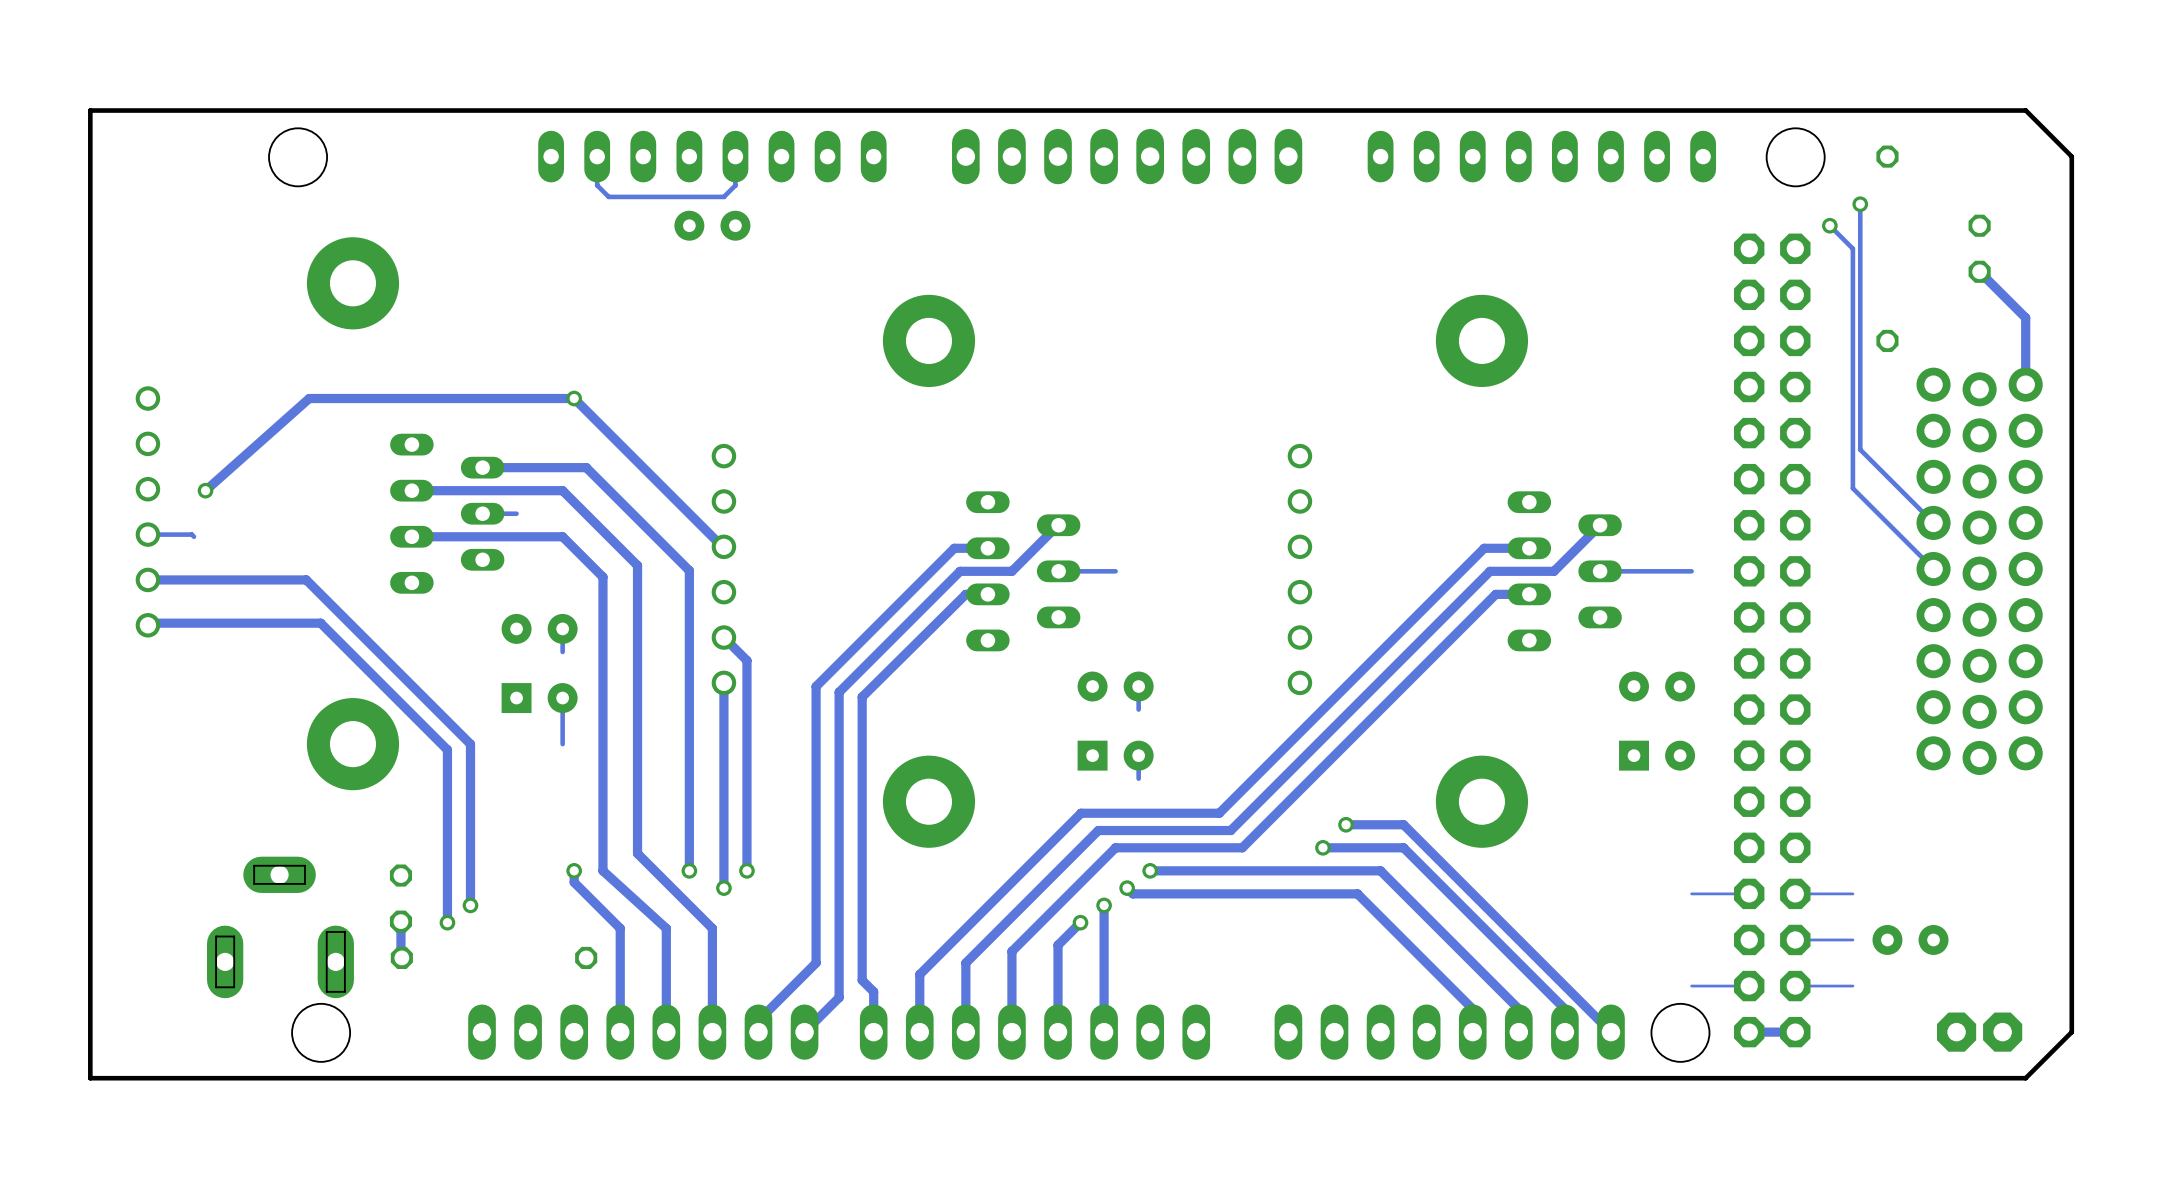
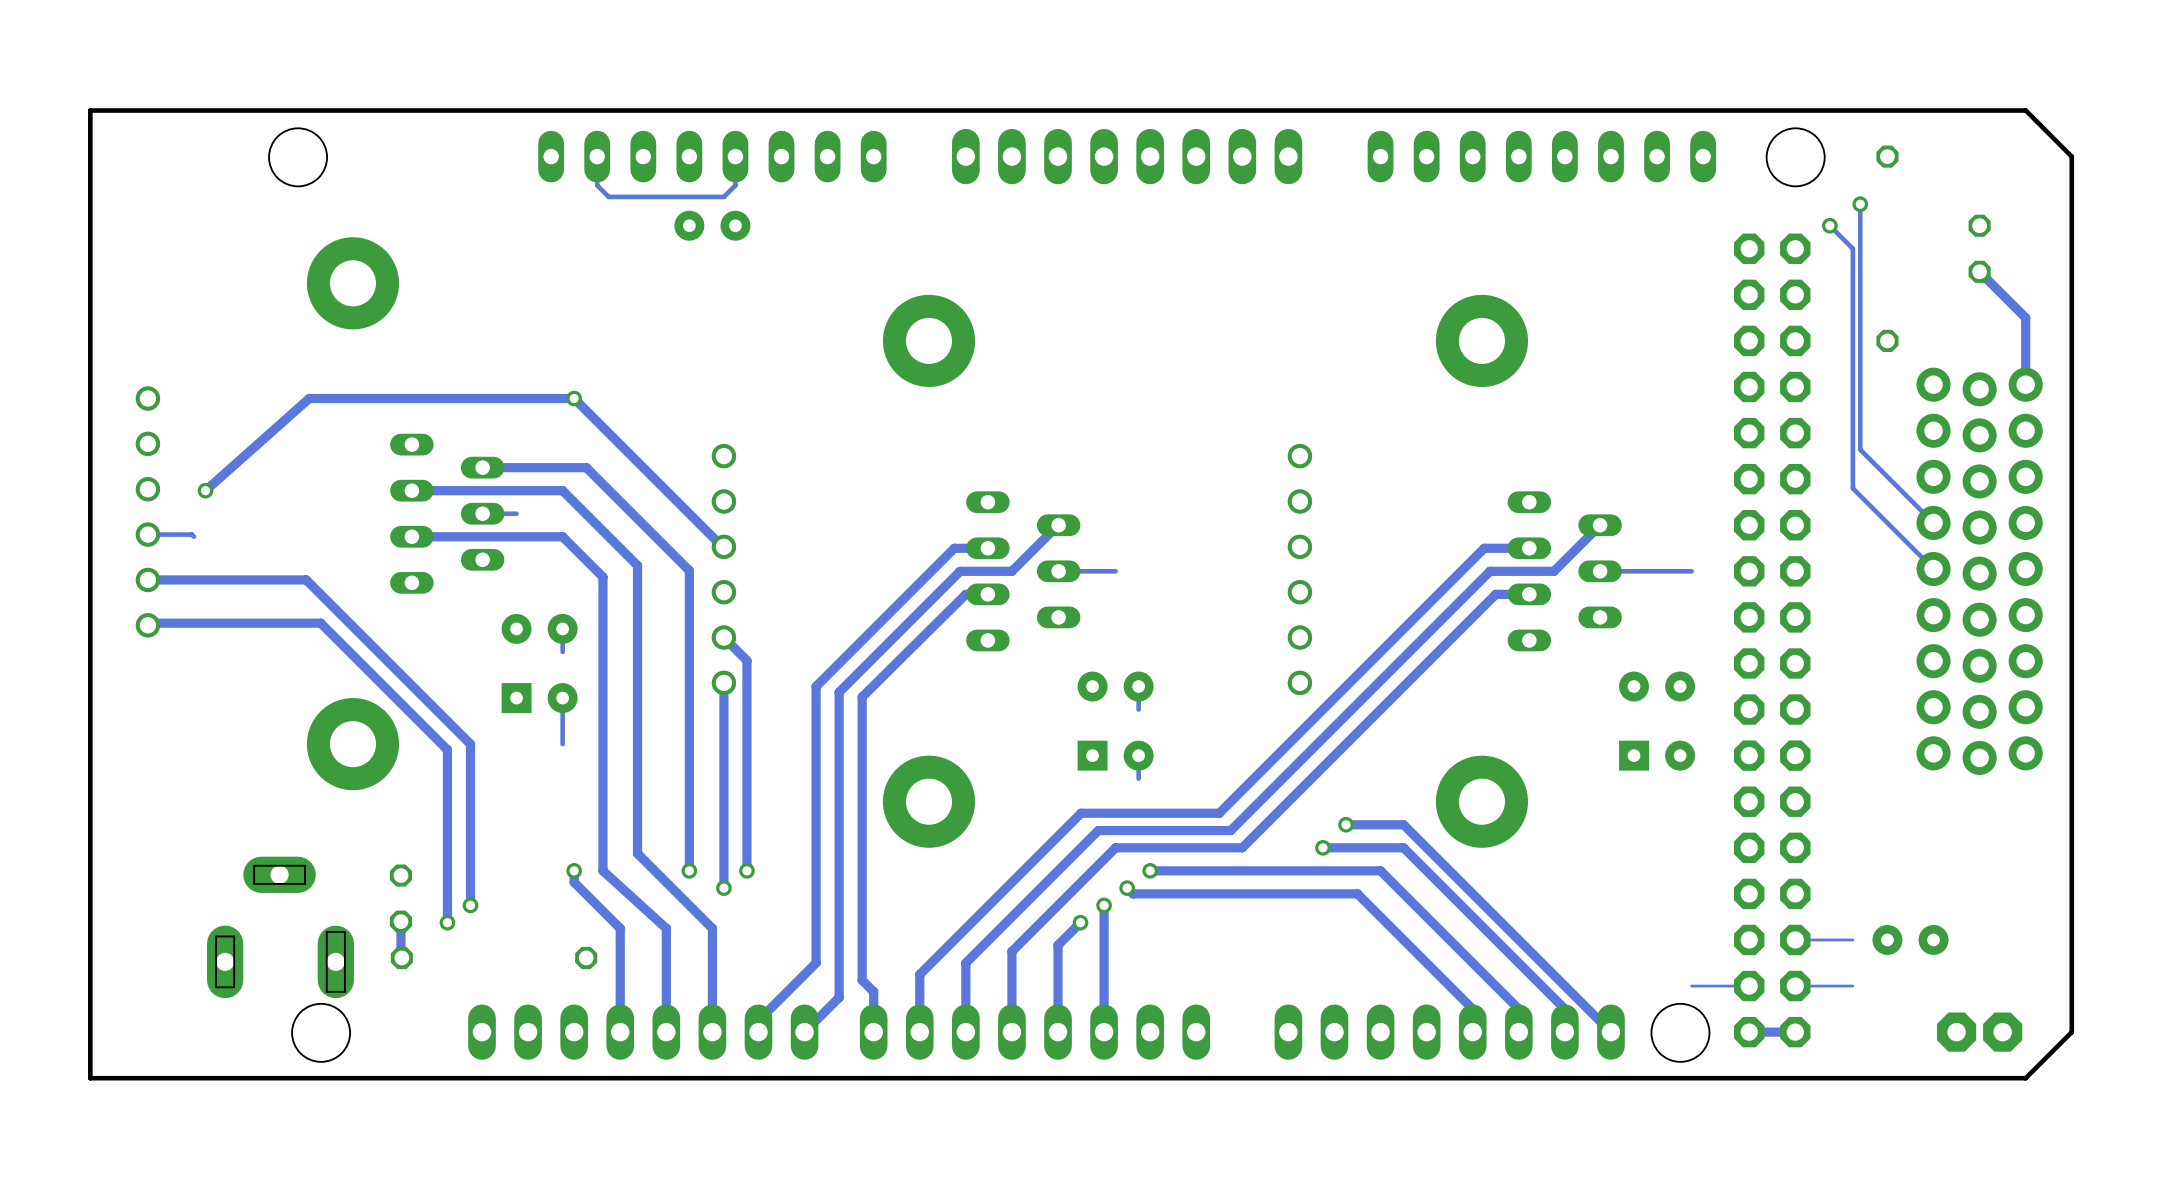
track: (1749, 893) (1691, 893) -> none
track: (1852, 893) (1795, 893) -> none

